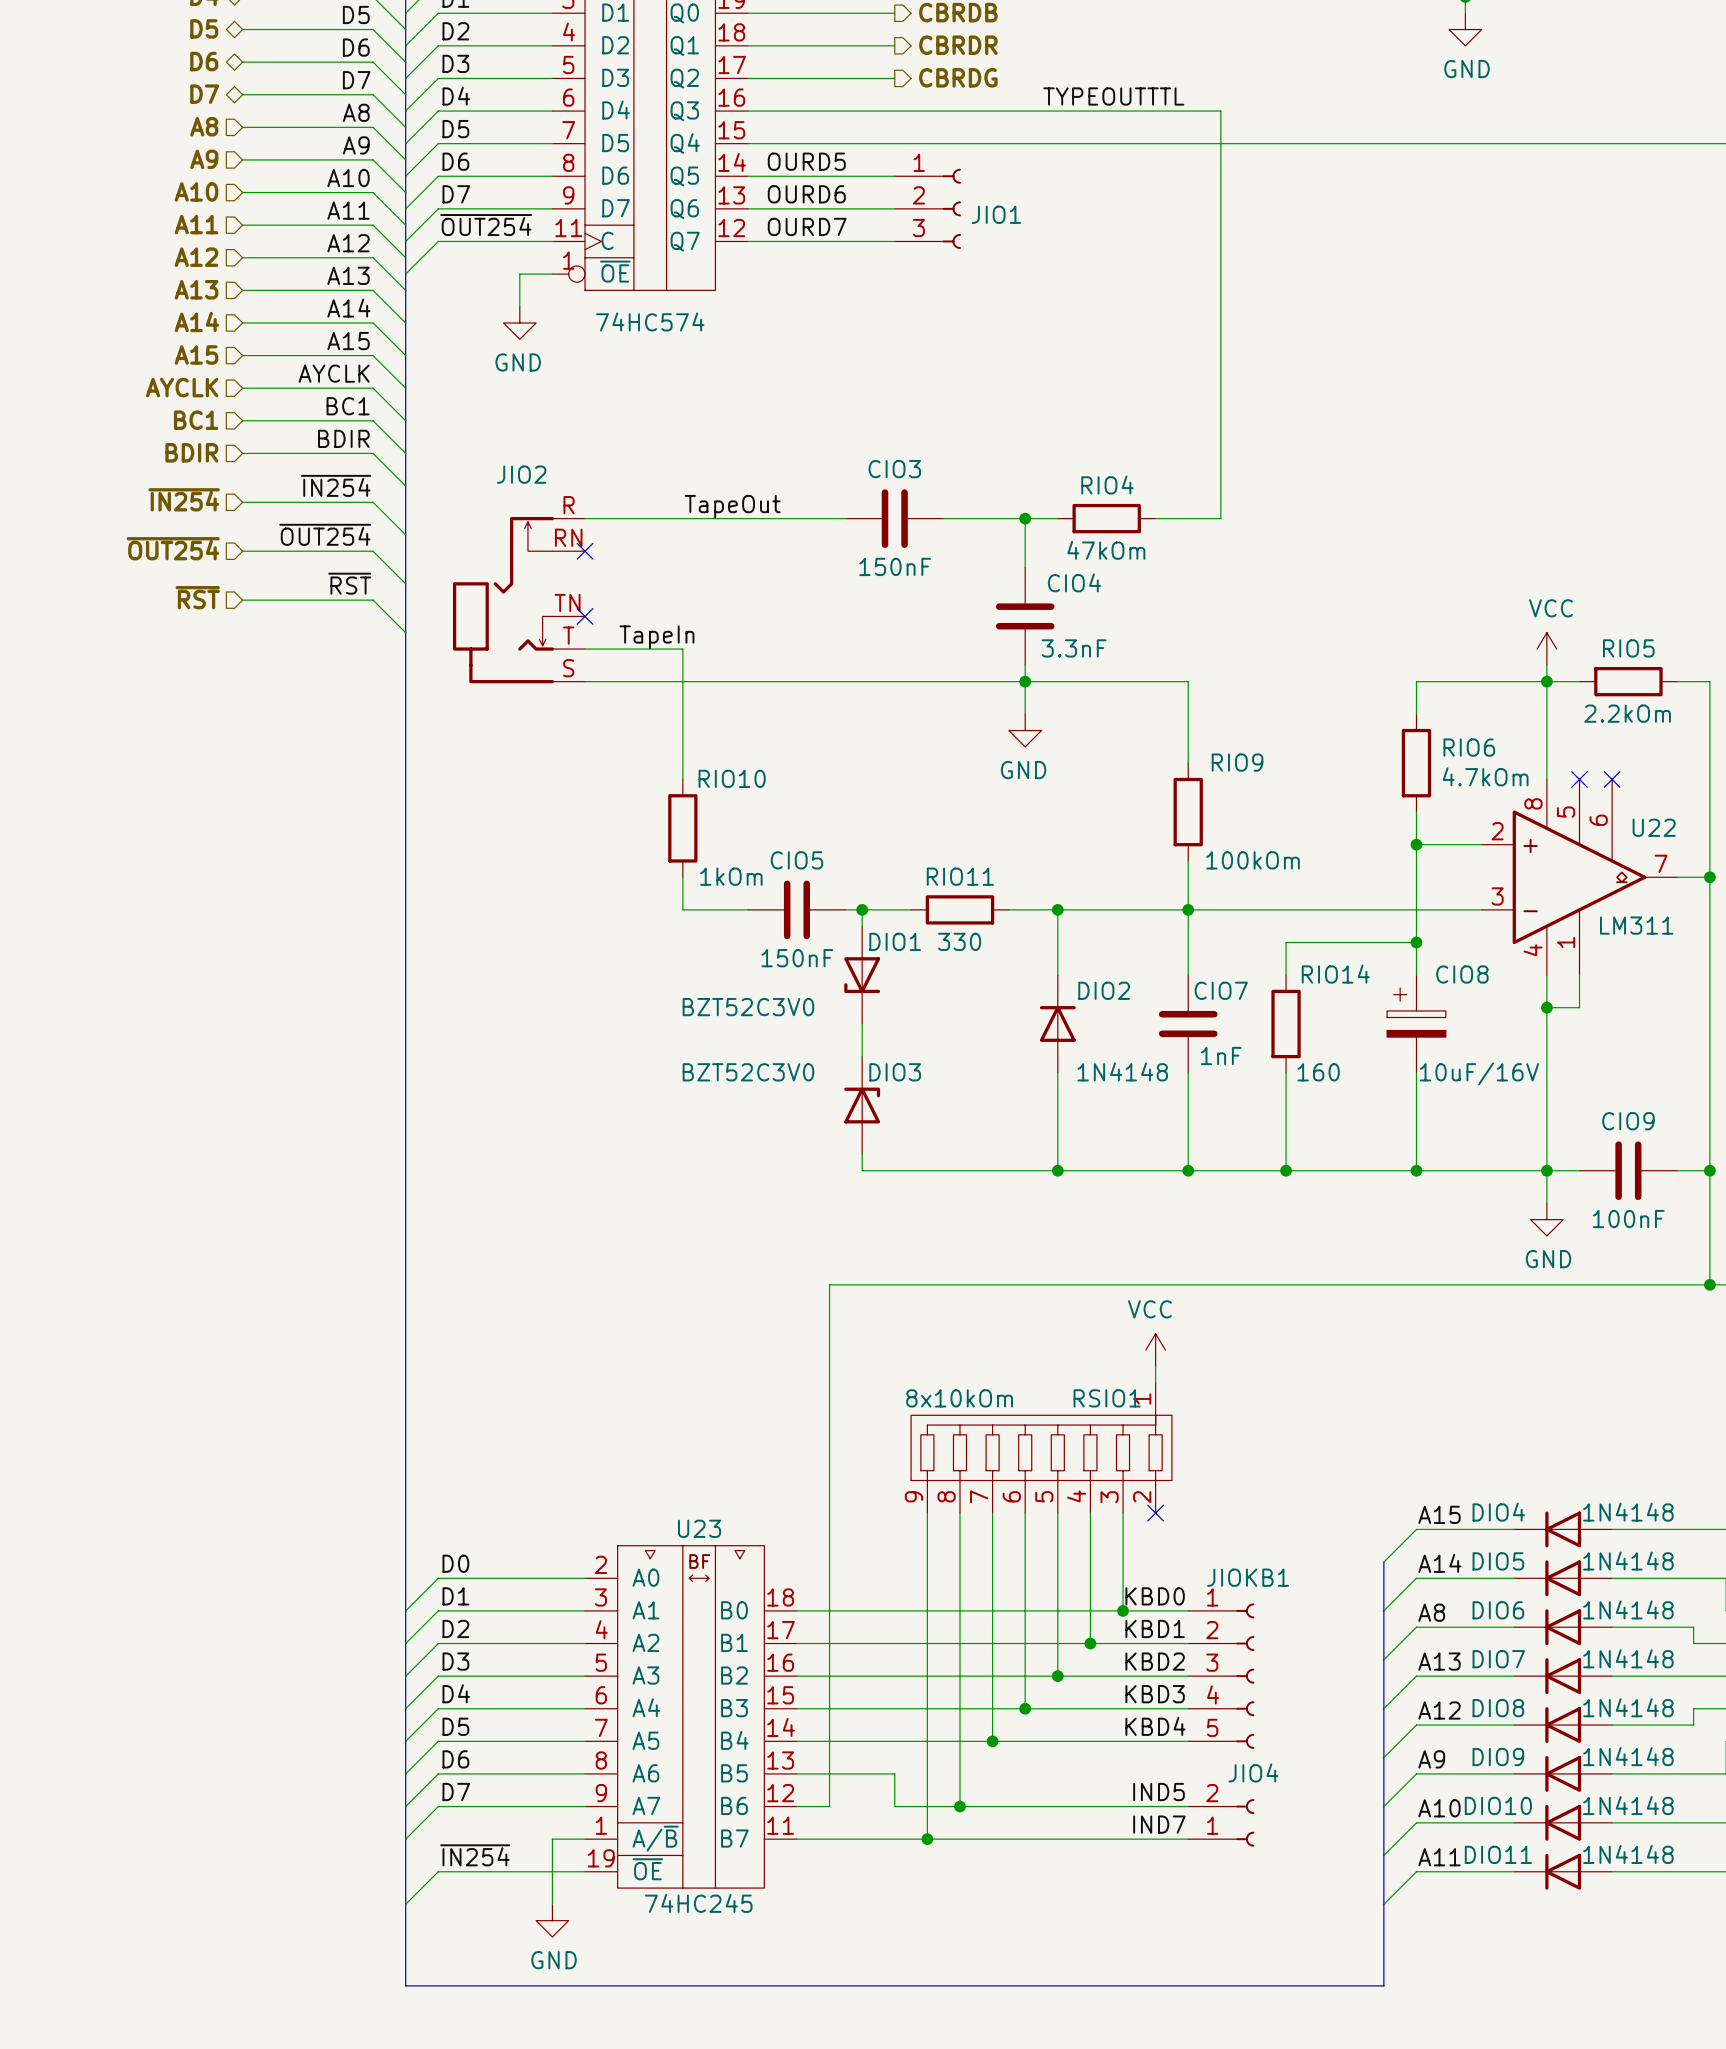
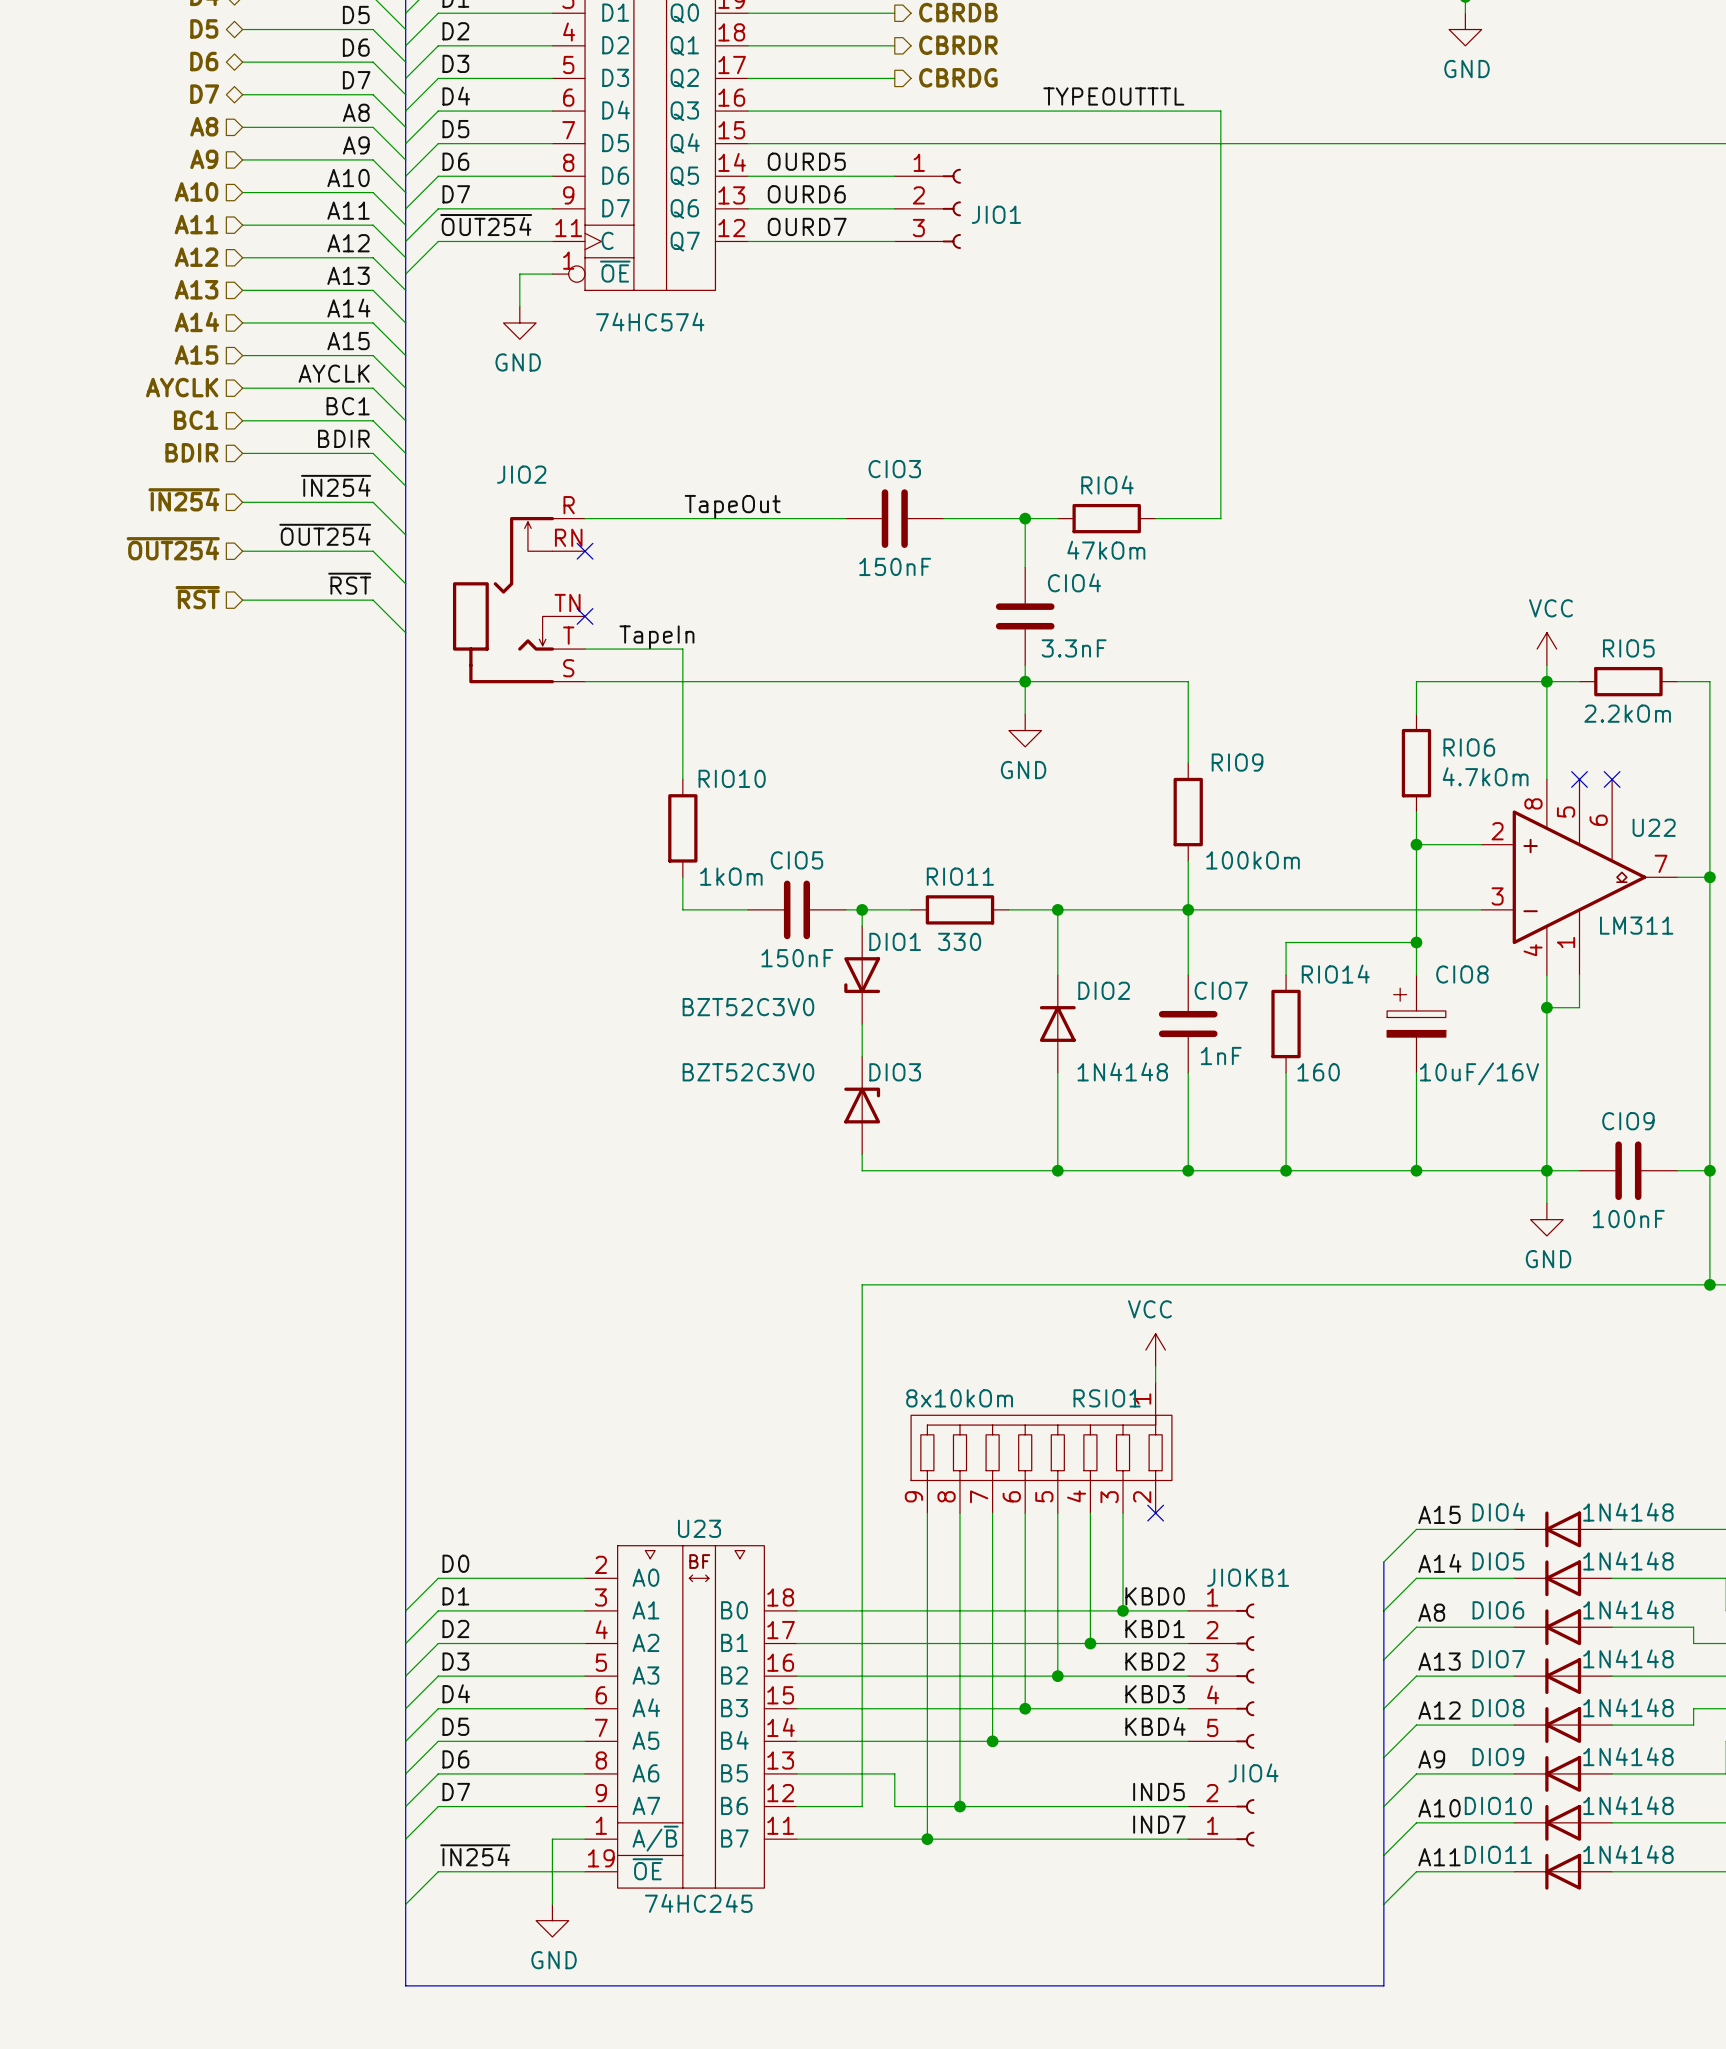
wire: (862, 1284) (829, 1284) (829, 1806) -> (862, 1284) (862, 1806) (829, 1806)

